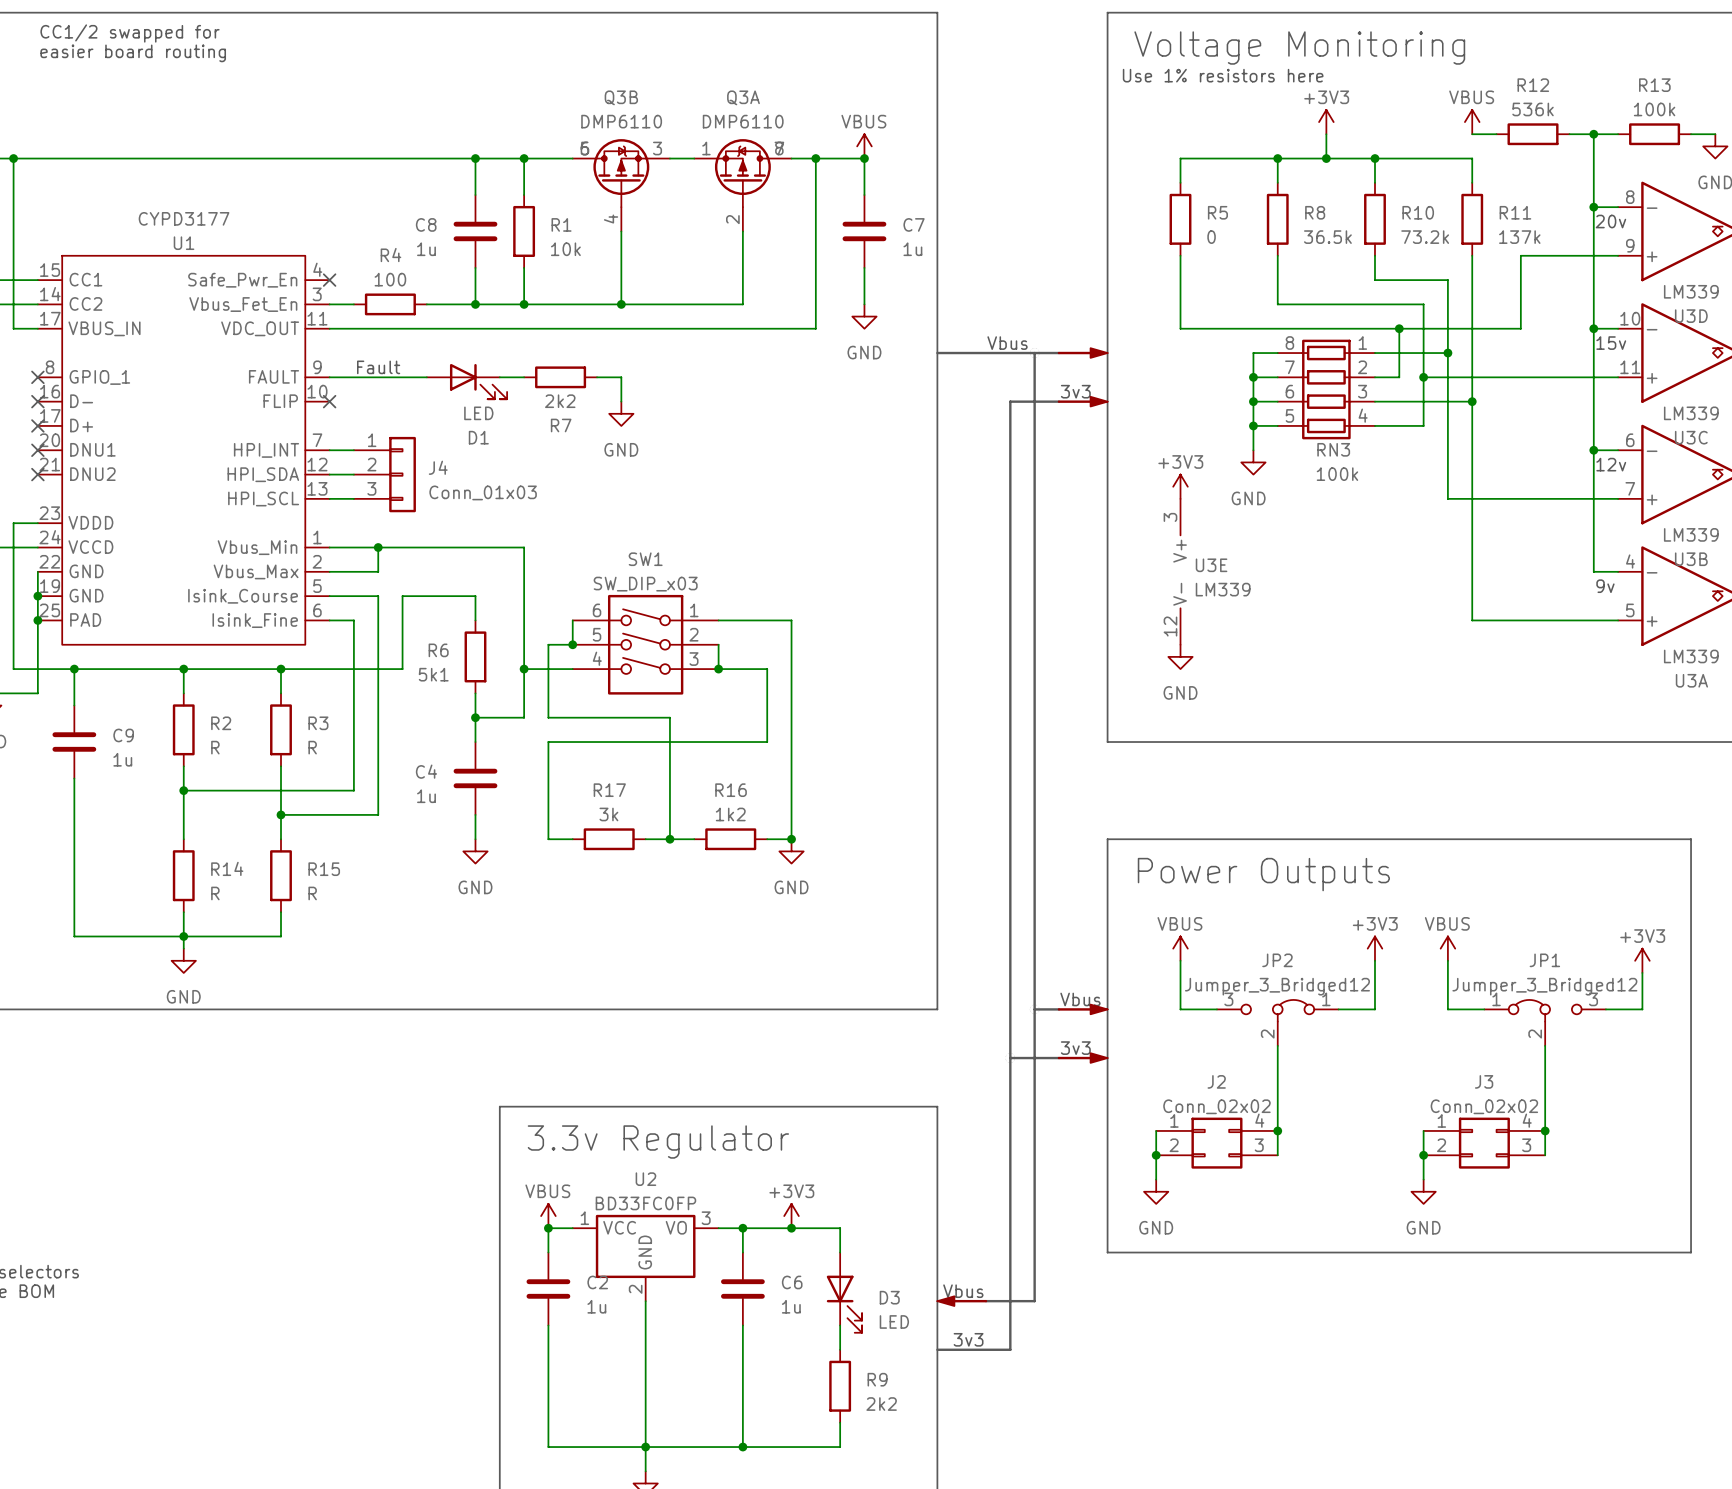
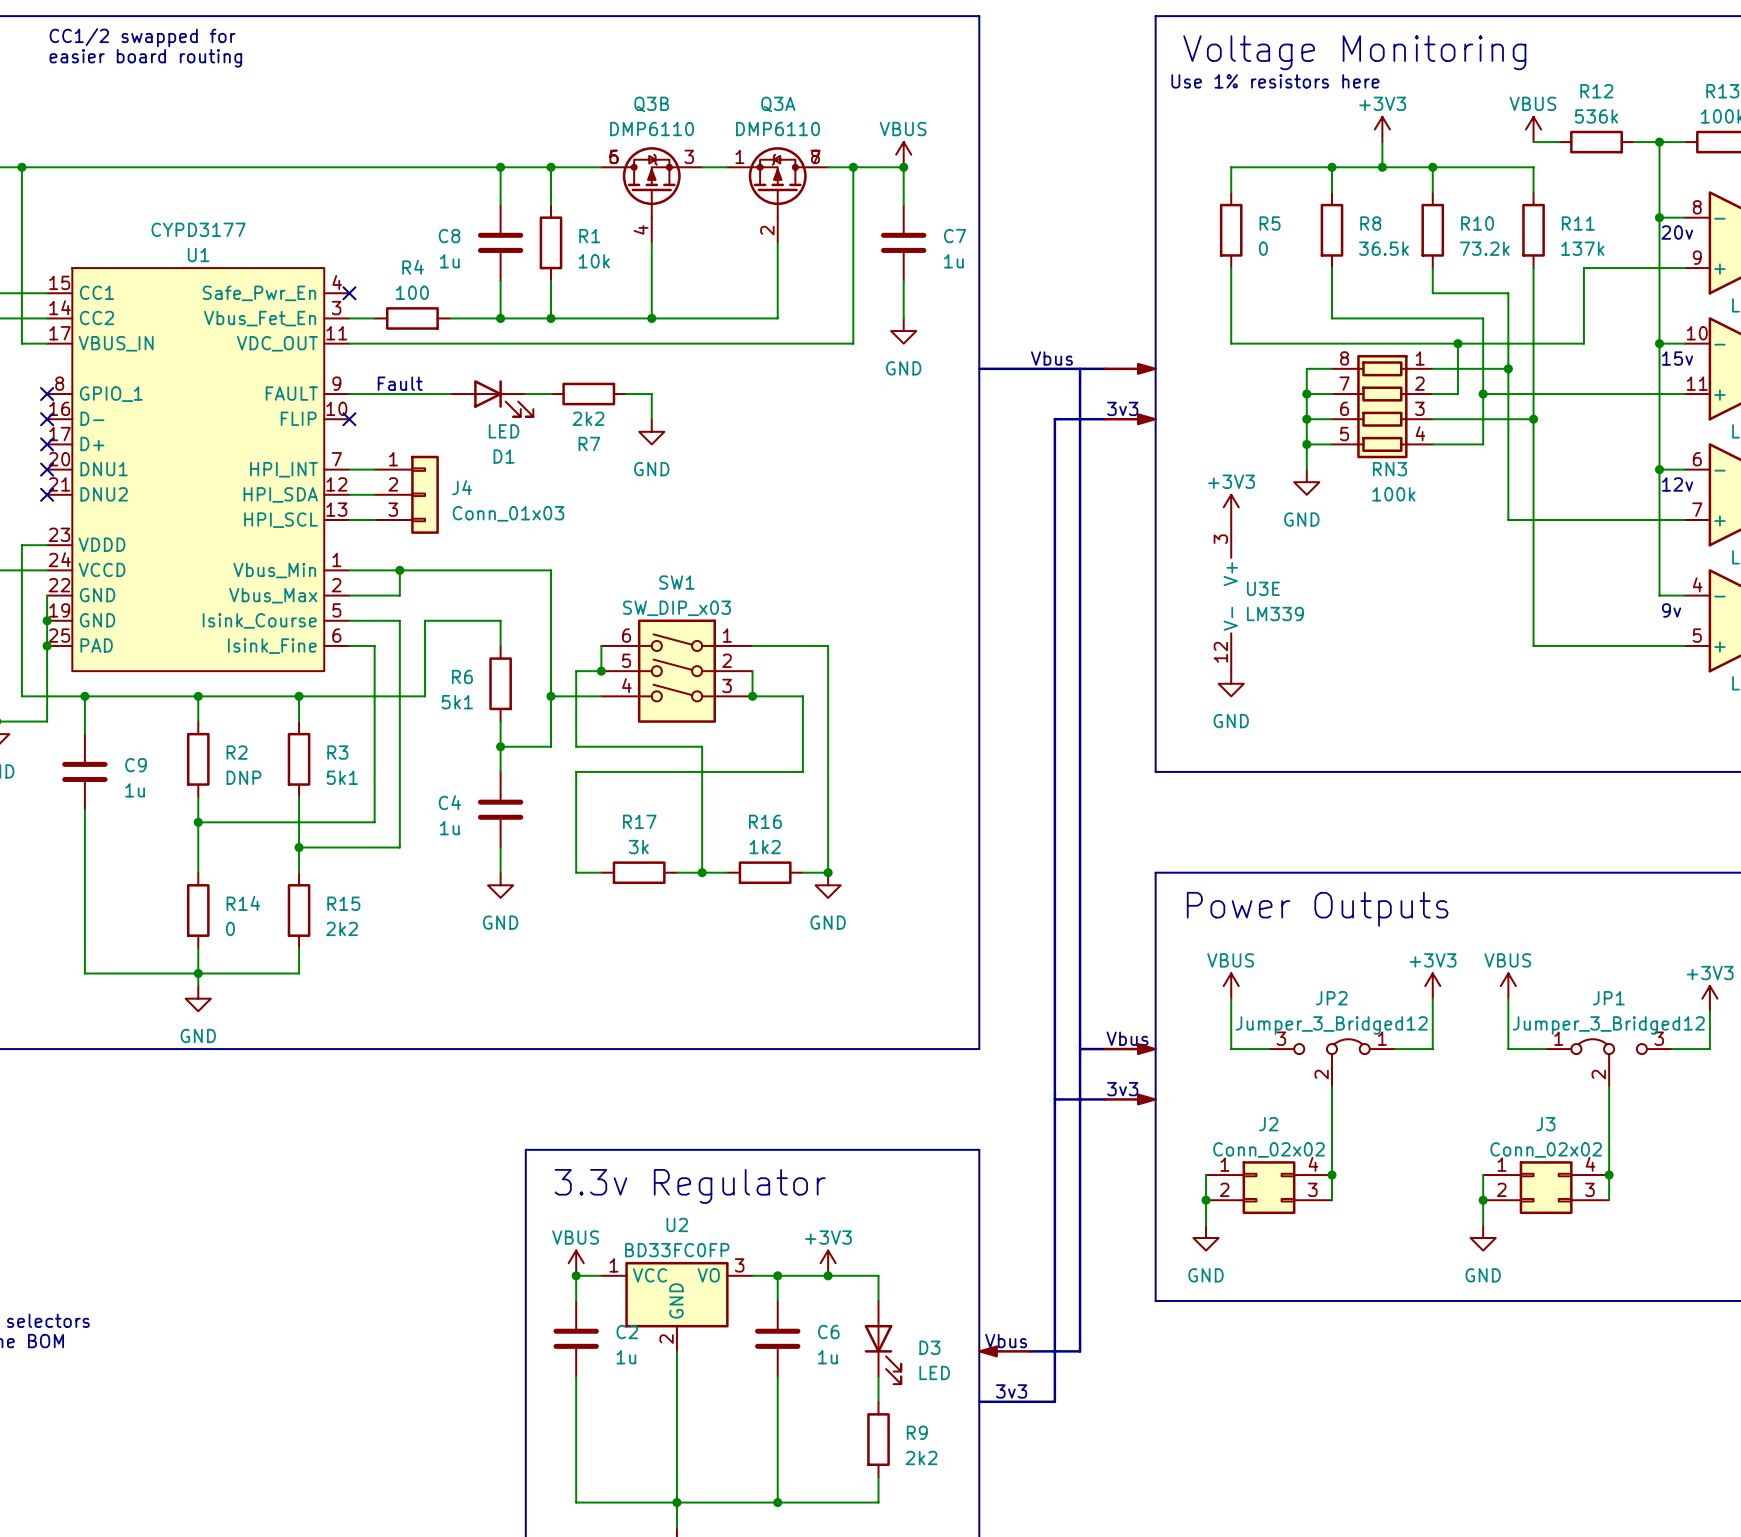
R2 value: R (215, 747) -> DNP (243, 777)
R3 value: R (312, 747) -> 5k1 (342, 777)
R14 value: R (215, 893) -> 0 (230, 928)
R15 value: R (312, 893) -> 2k2 (342, 928)

